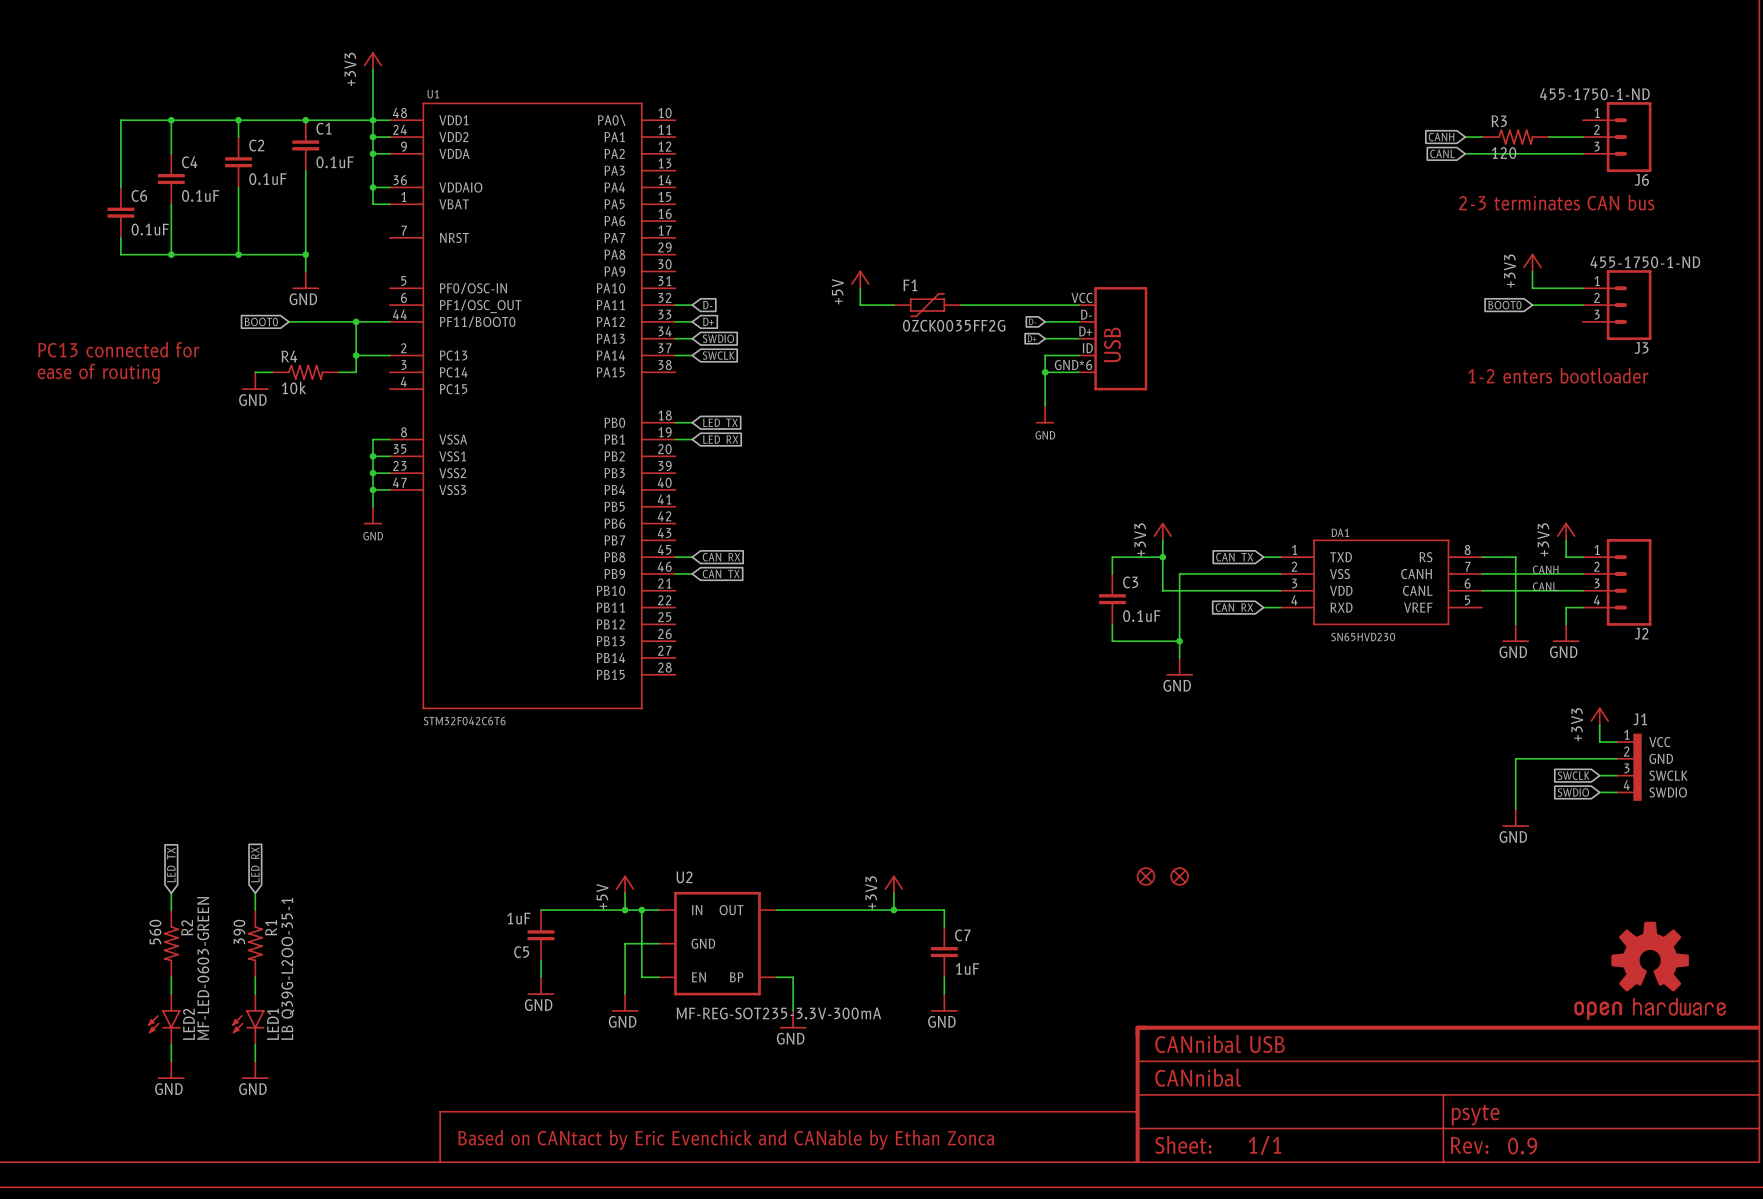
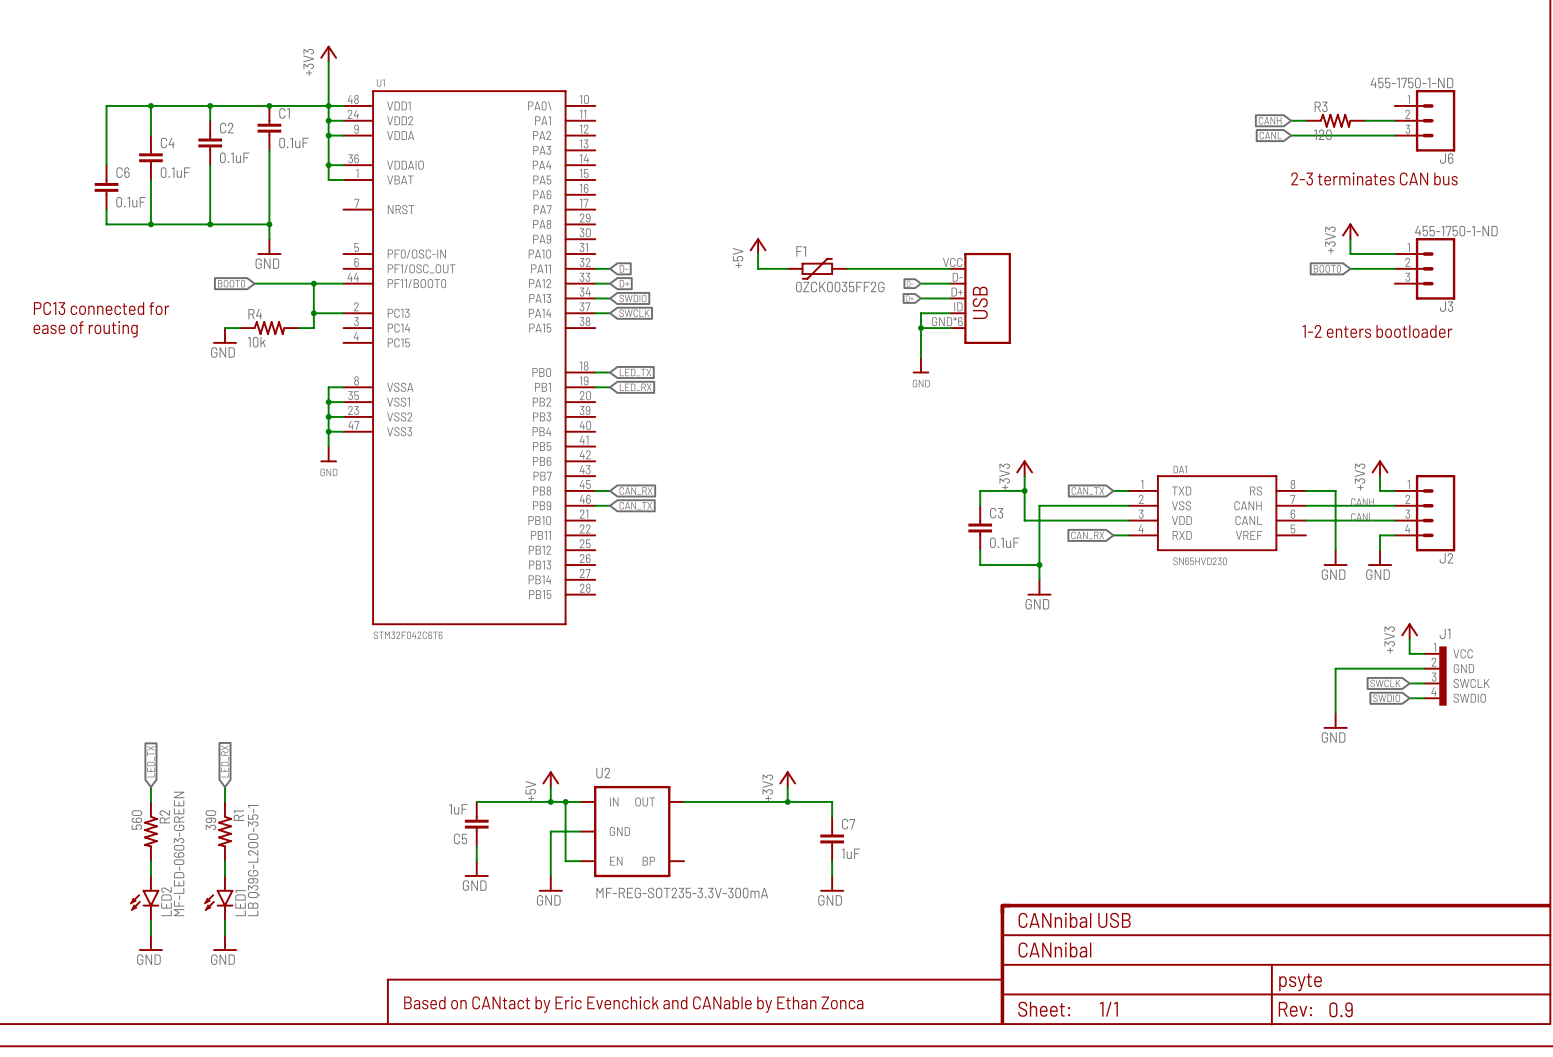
part: (1146, 876) -> none
part: (1179, 876) -> none
part: (1650, 970) -> none
wire: (776, 977) (793, 977) (793, 1010) -> none
power symbol: GND (793, 1019) -> none

